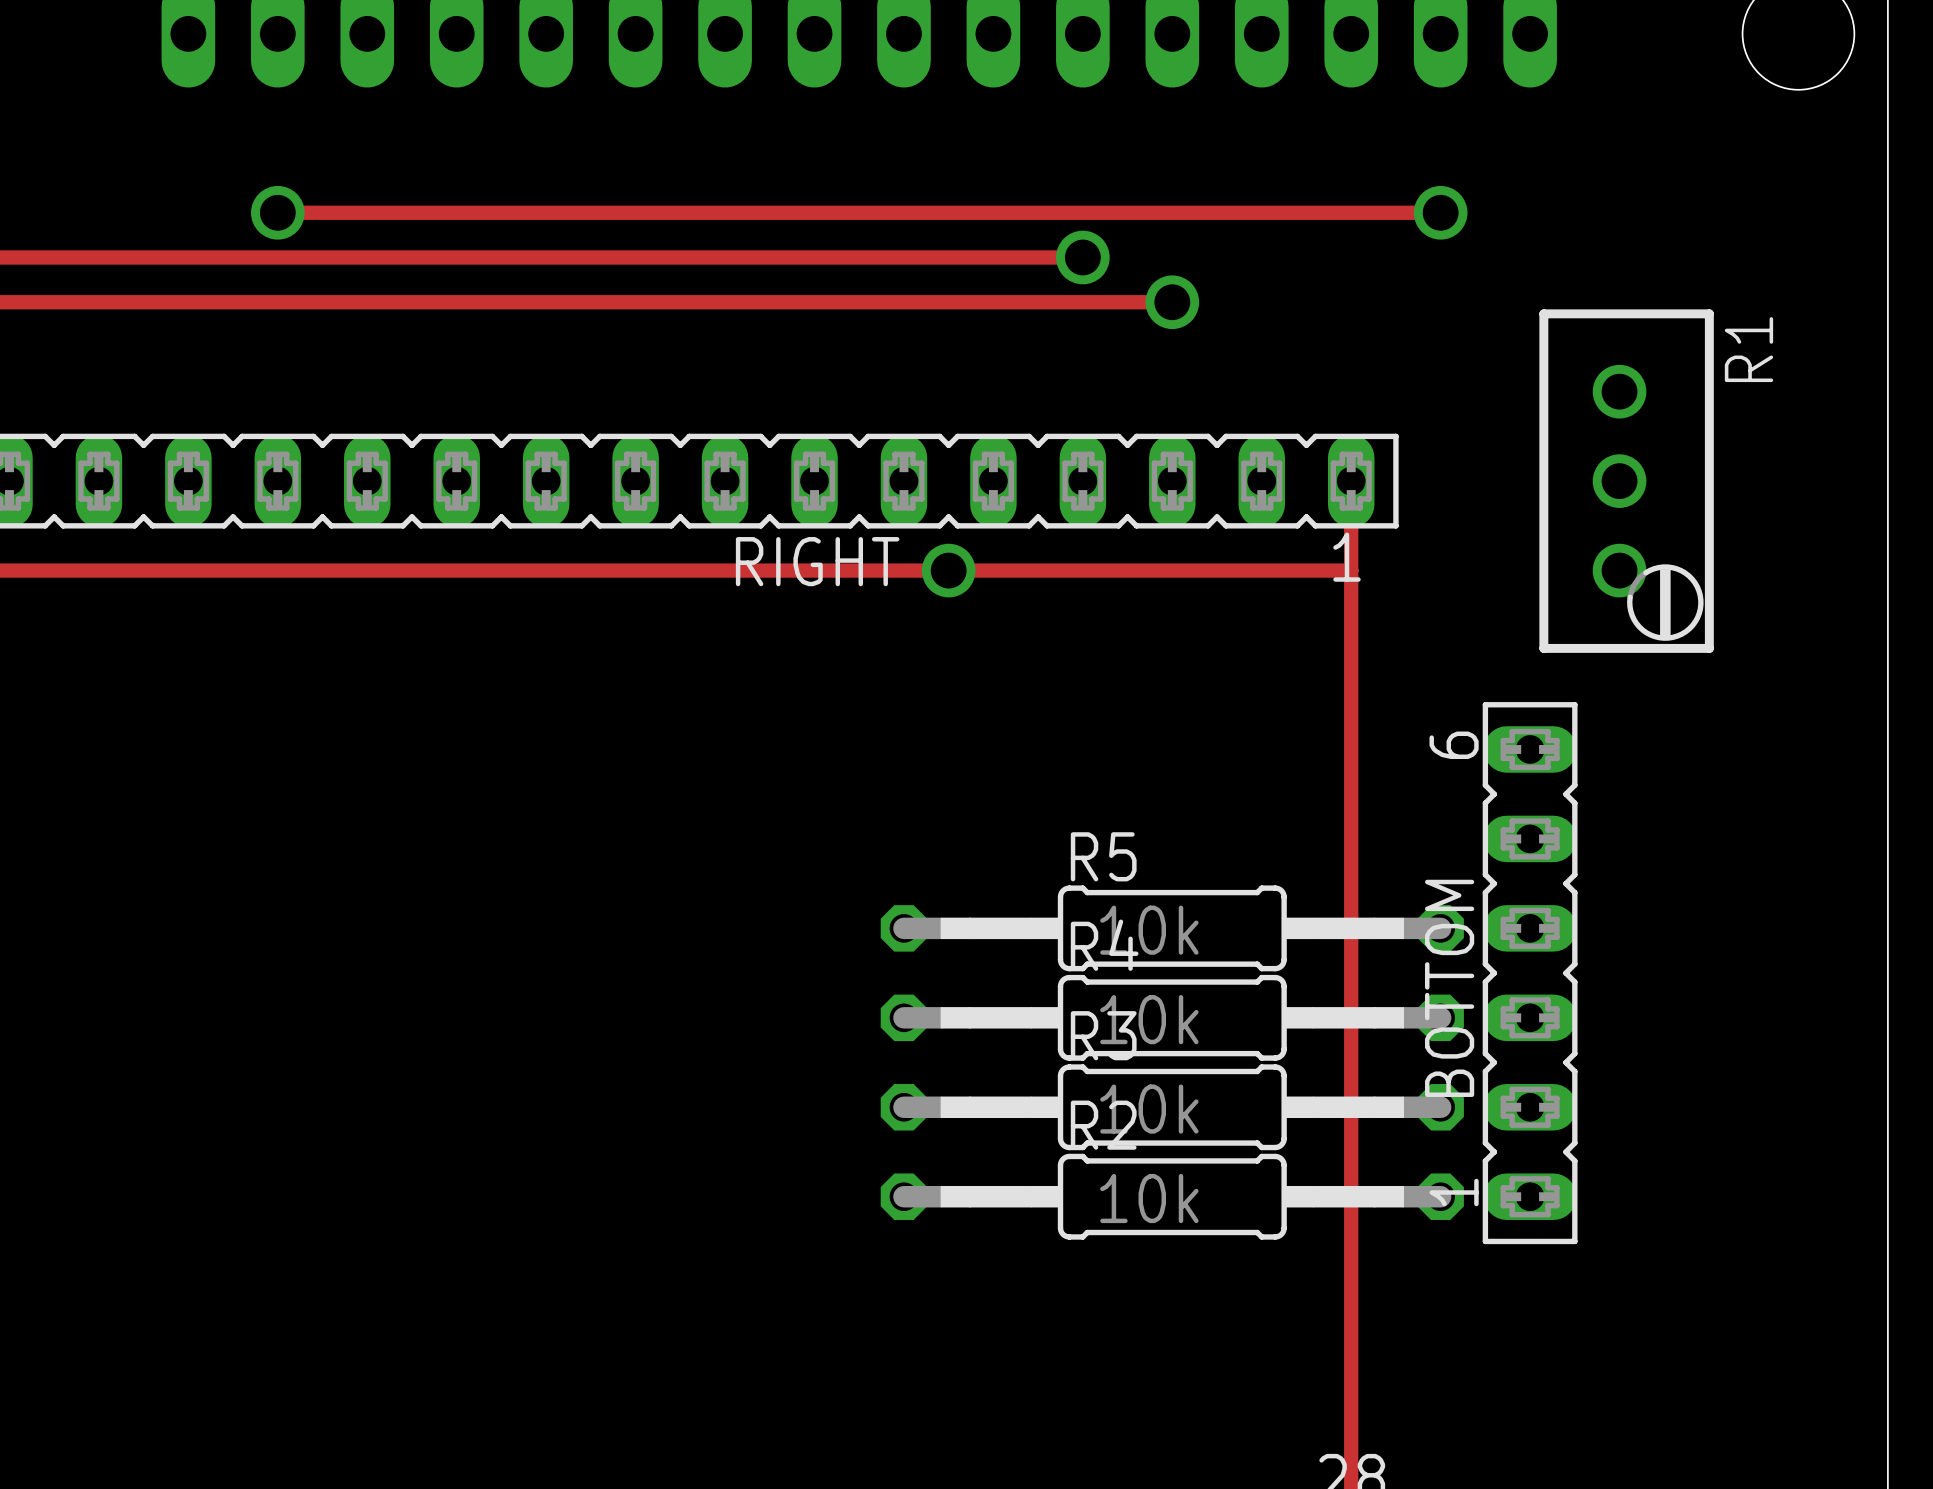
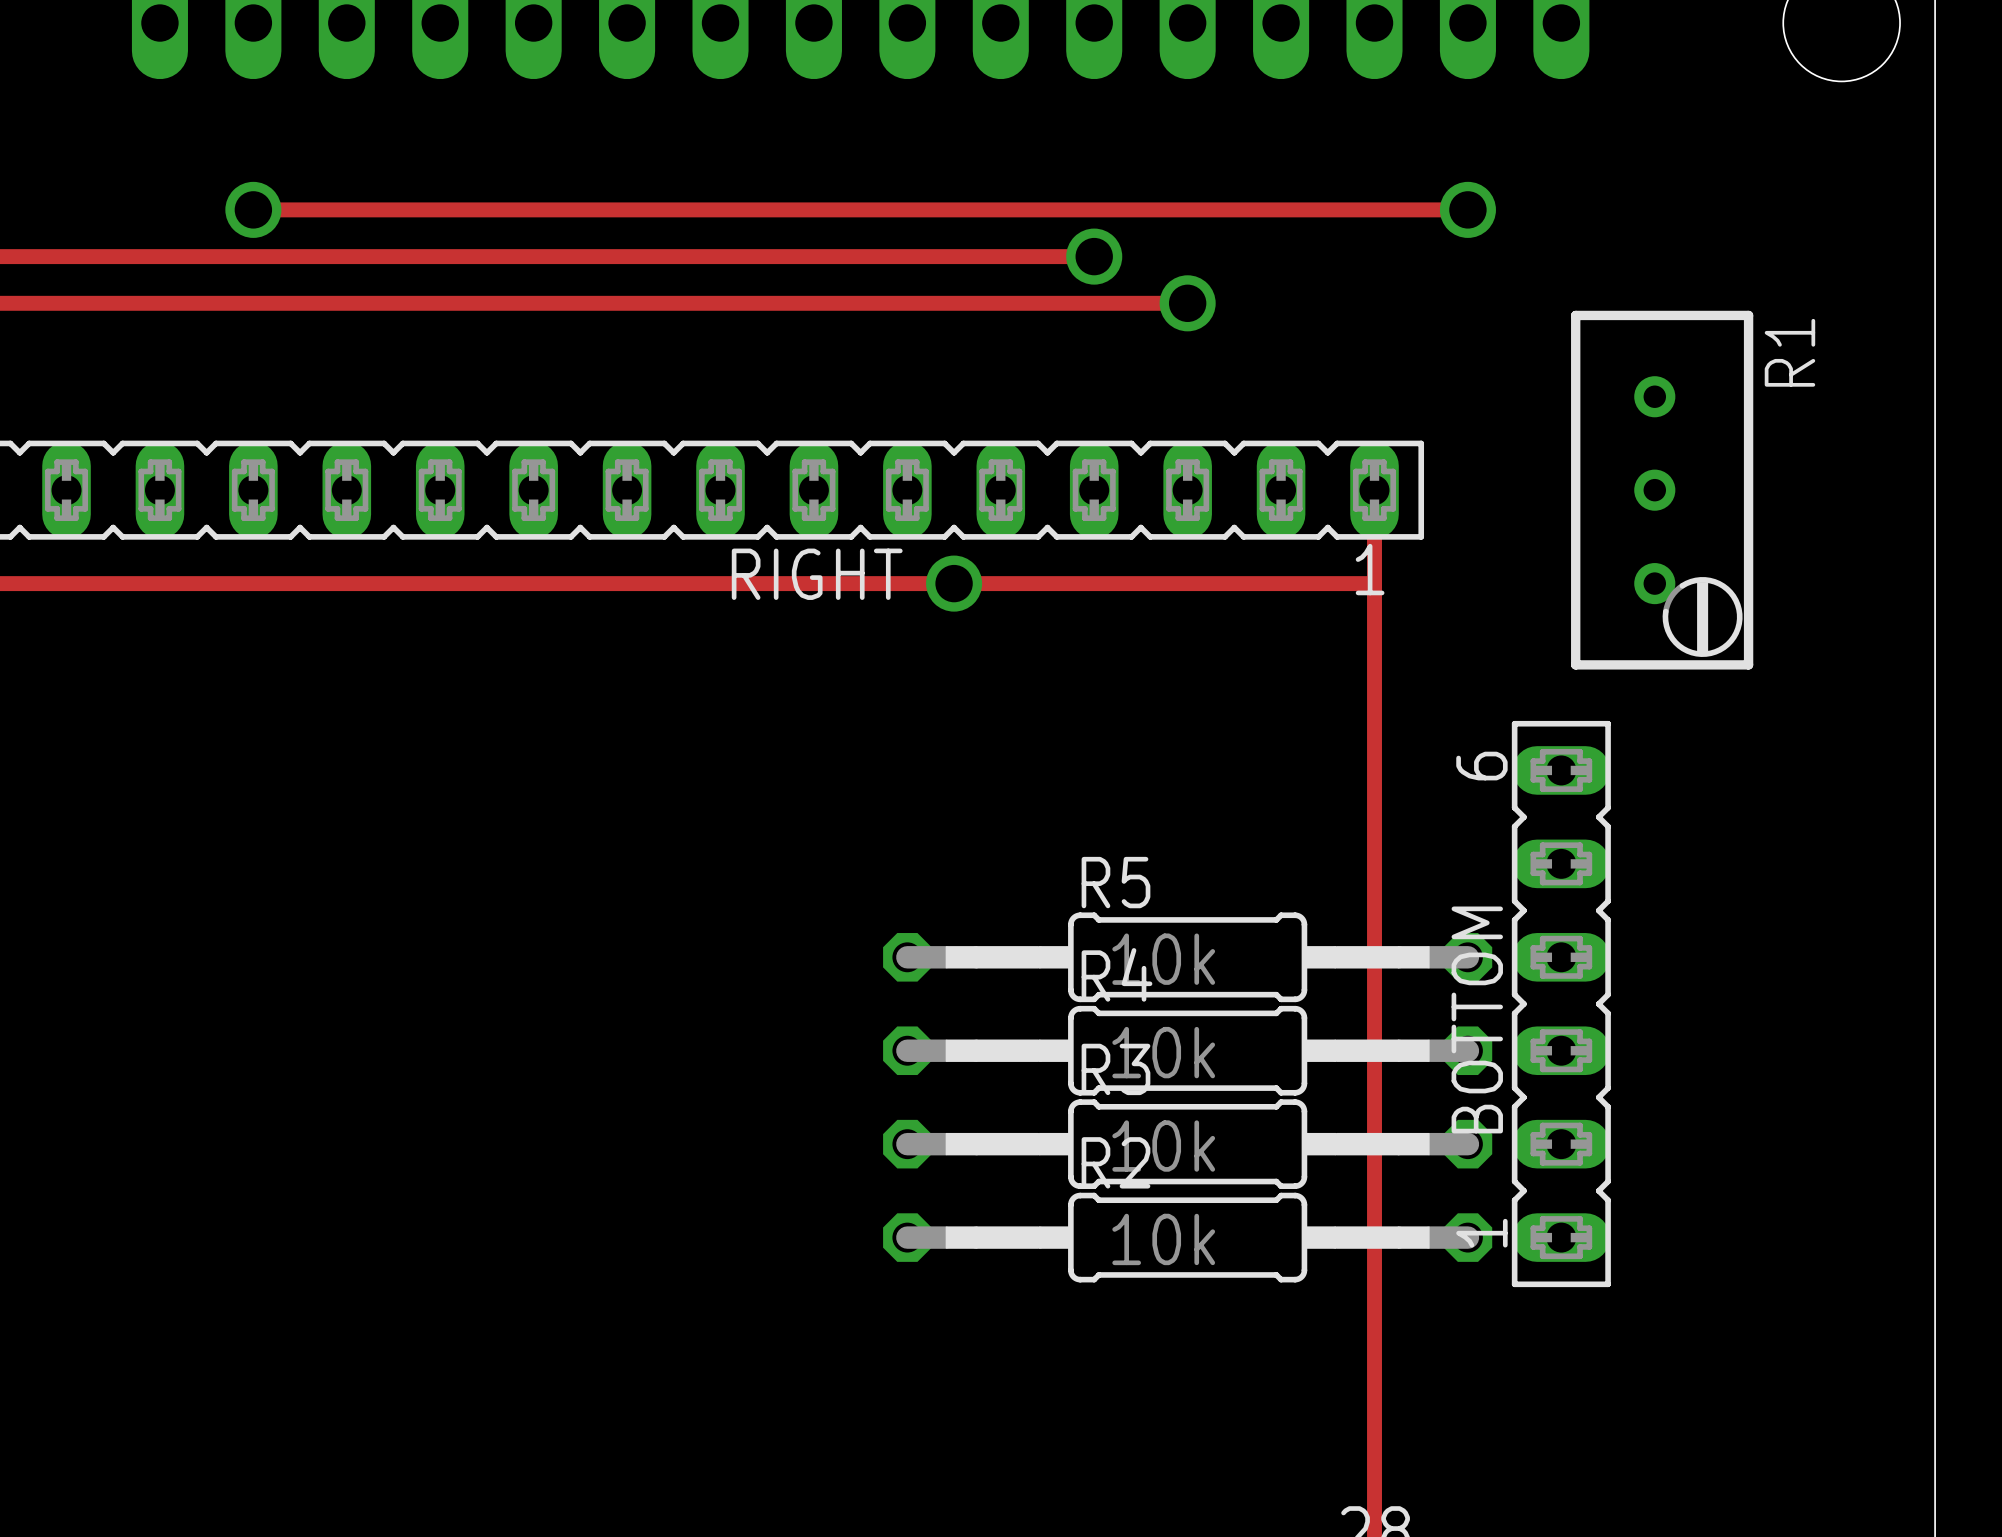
R1 footprint: [1539, 309, 1714, 653] -> [1571, 310, 1754, 670]

